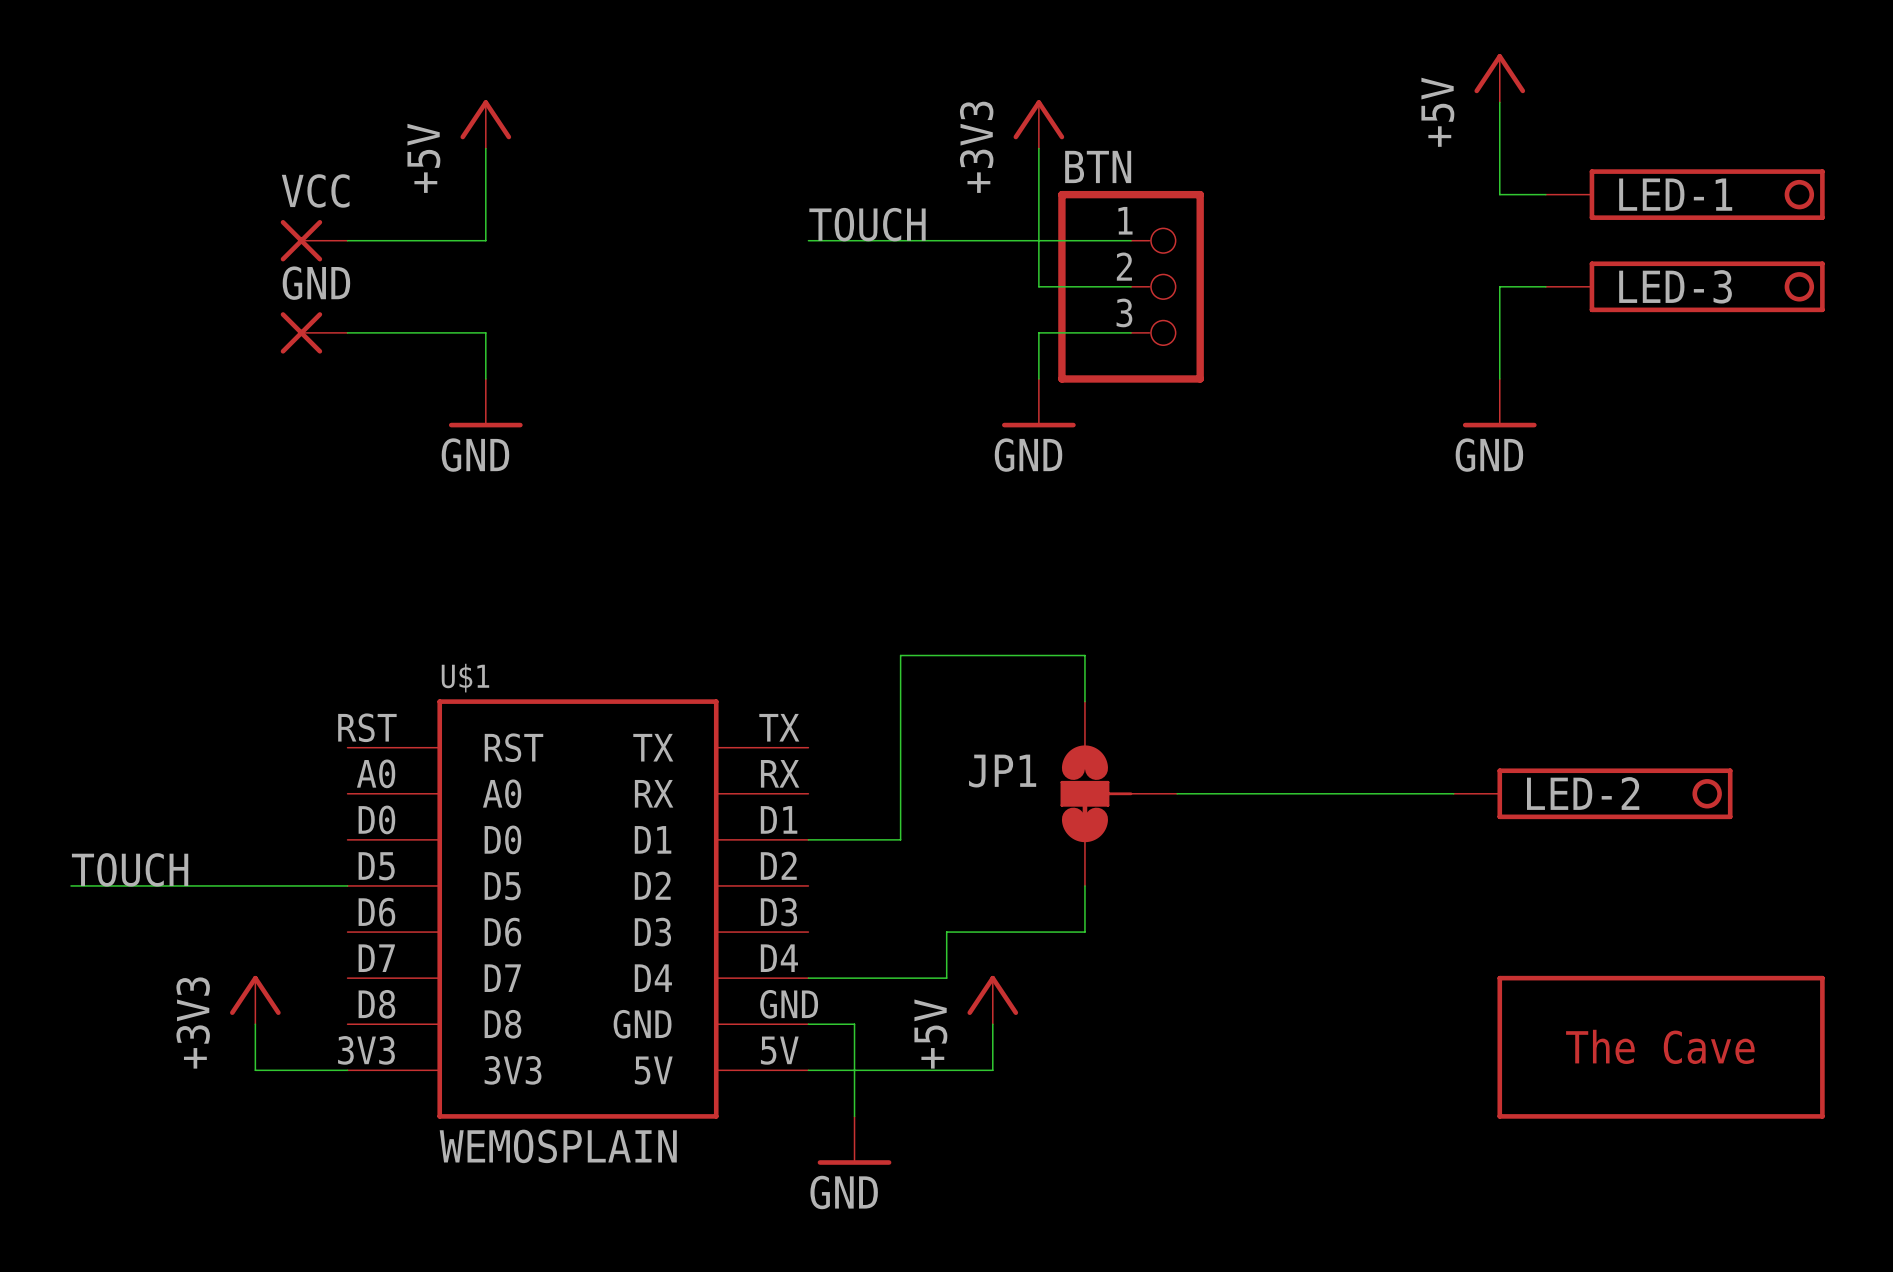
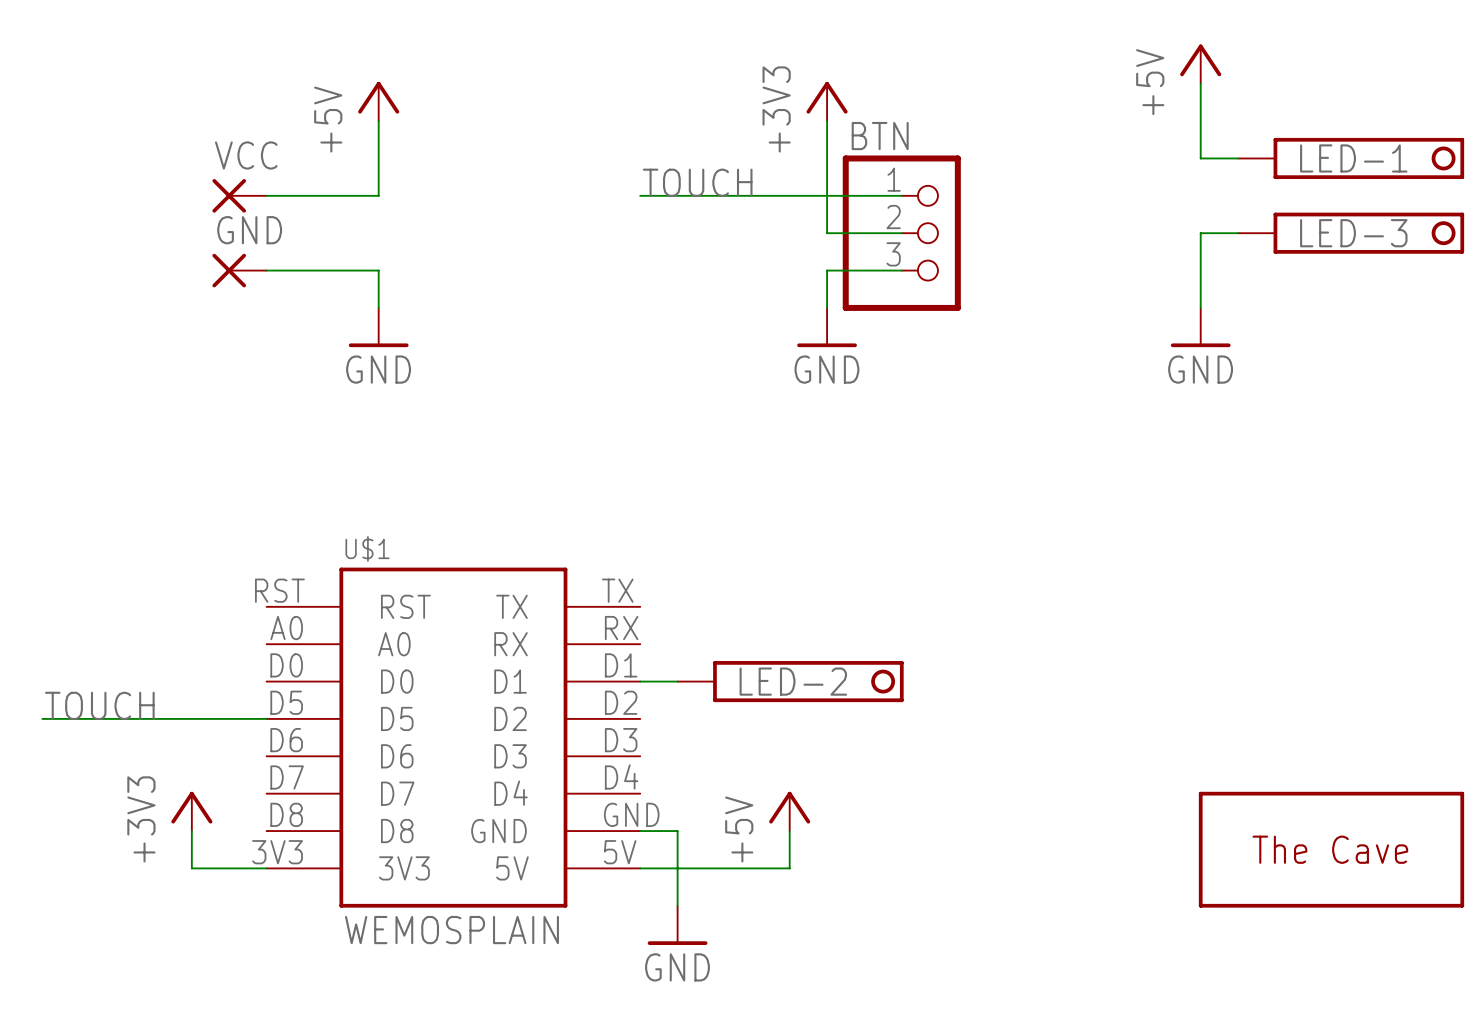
wire: (1084, 701) (1084, 655) (900, 655) (900, 839) (854, 839) -> none
JP1: (1118, 793) -> none
wire: (1177, 793) (1453, 793) -> none
LED-2 position: (1593, 793) -> (790, 681)
wire: (1084, 885) (1084, 932) (946, 932) (946, 978) (808, 978) -> none

